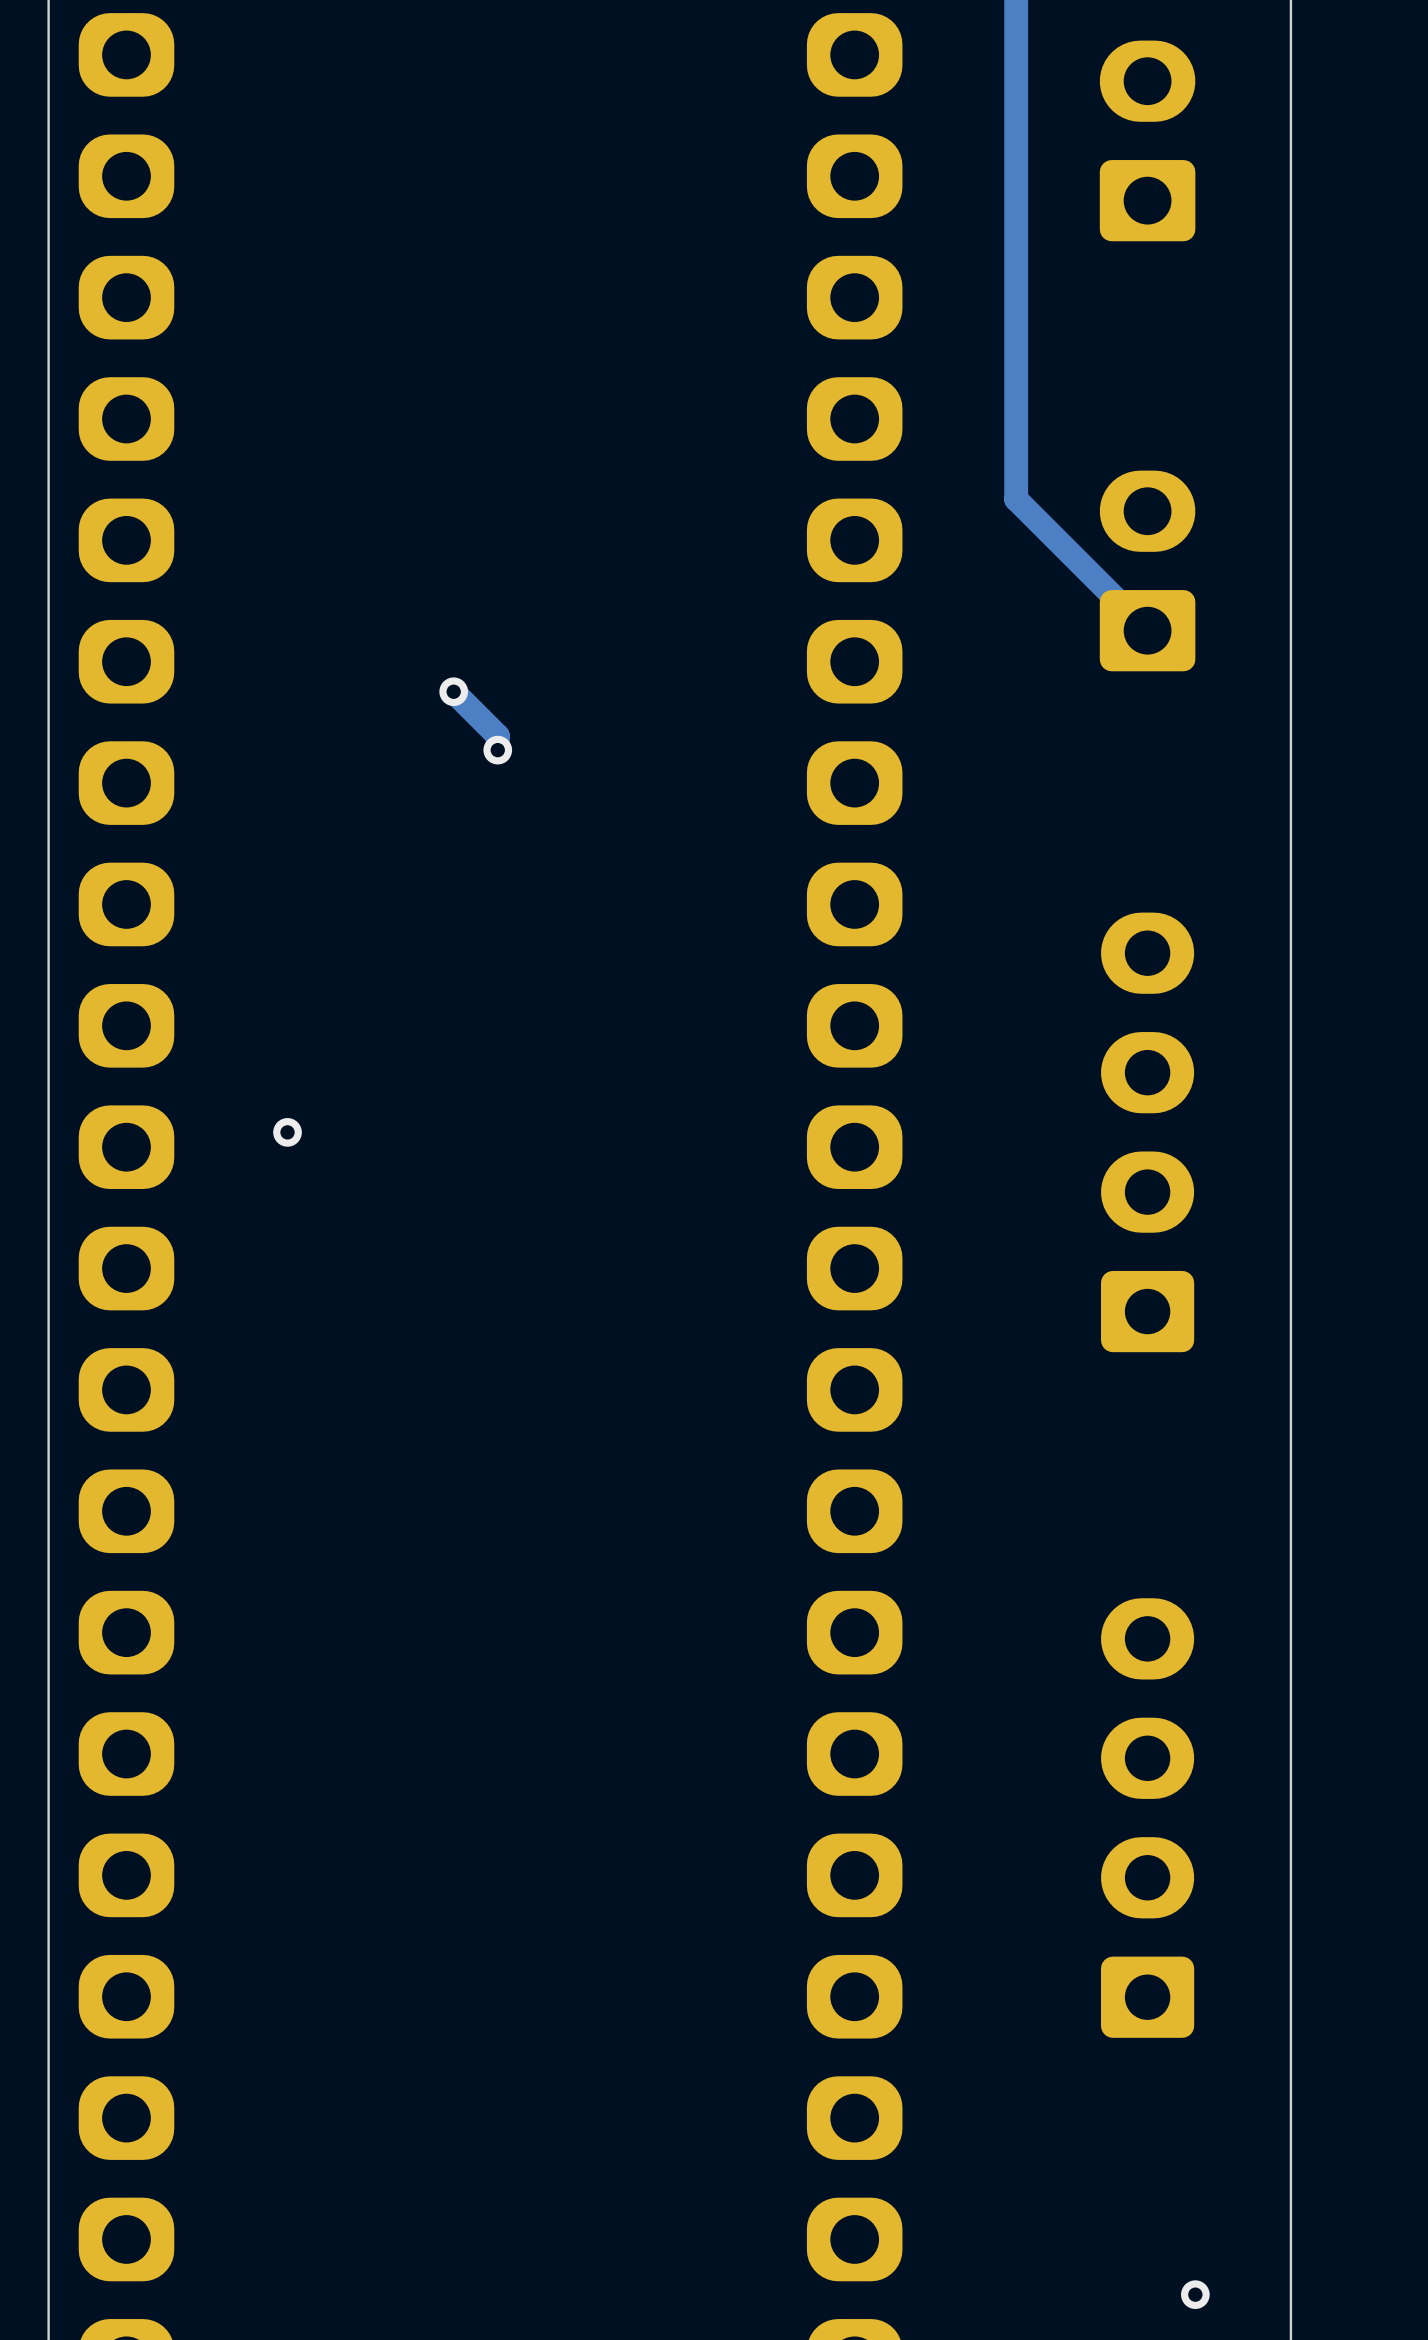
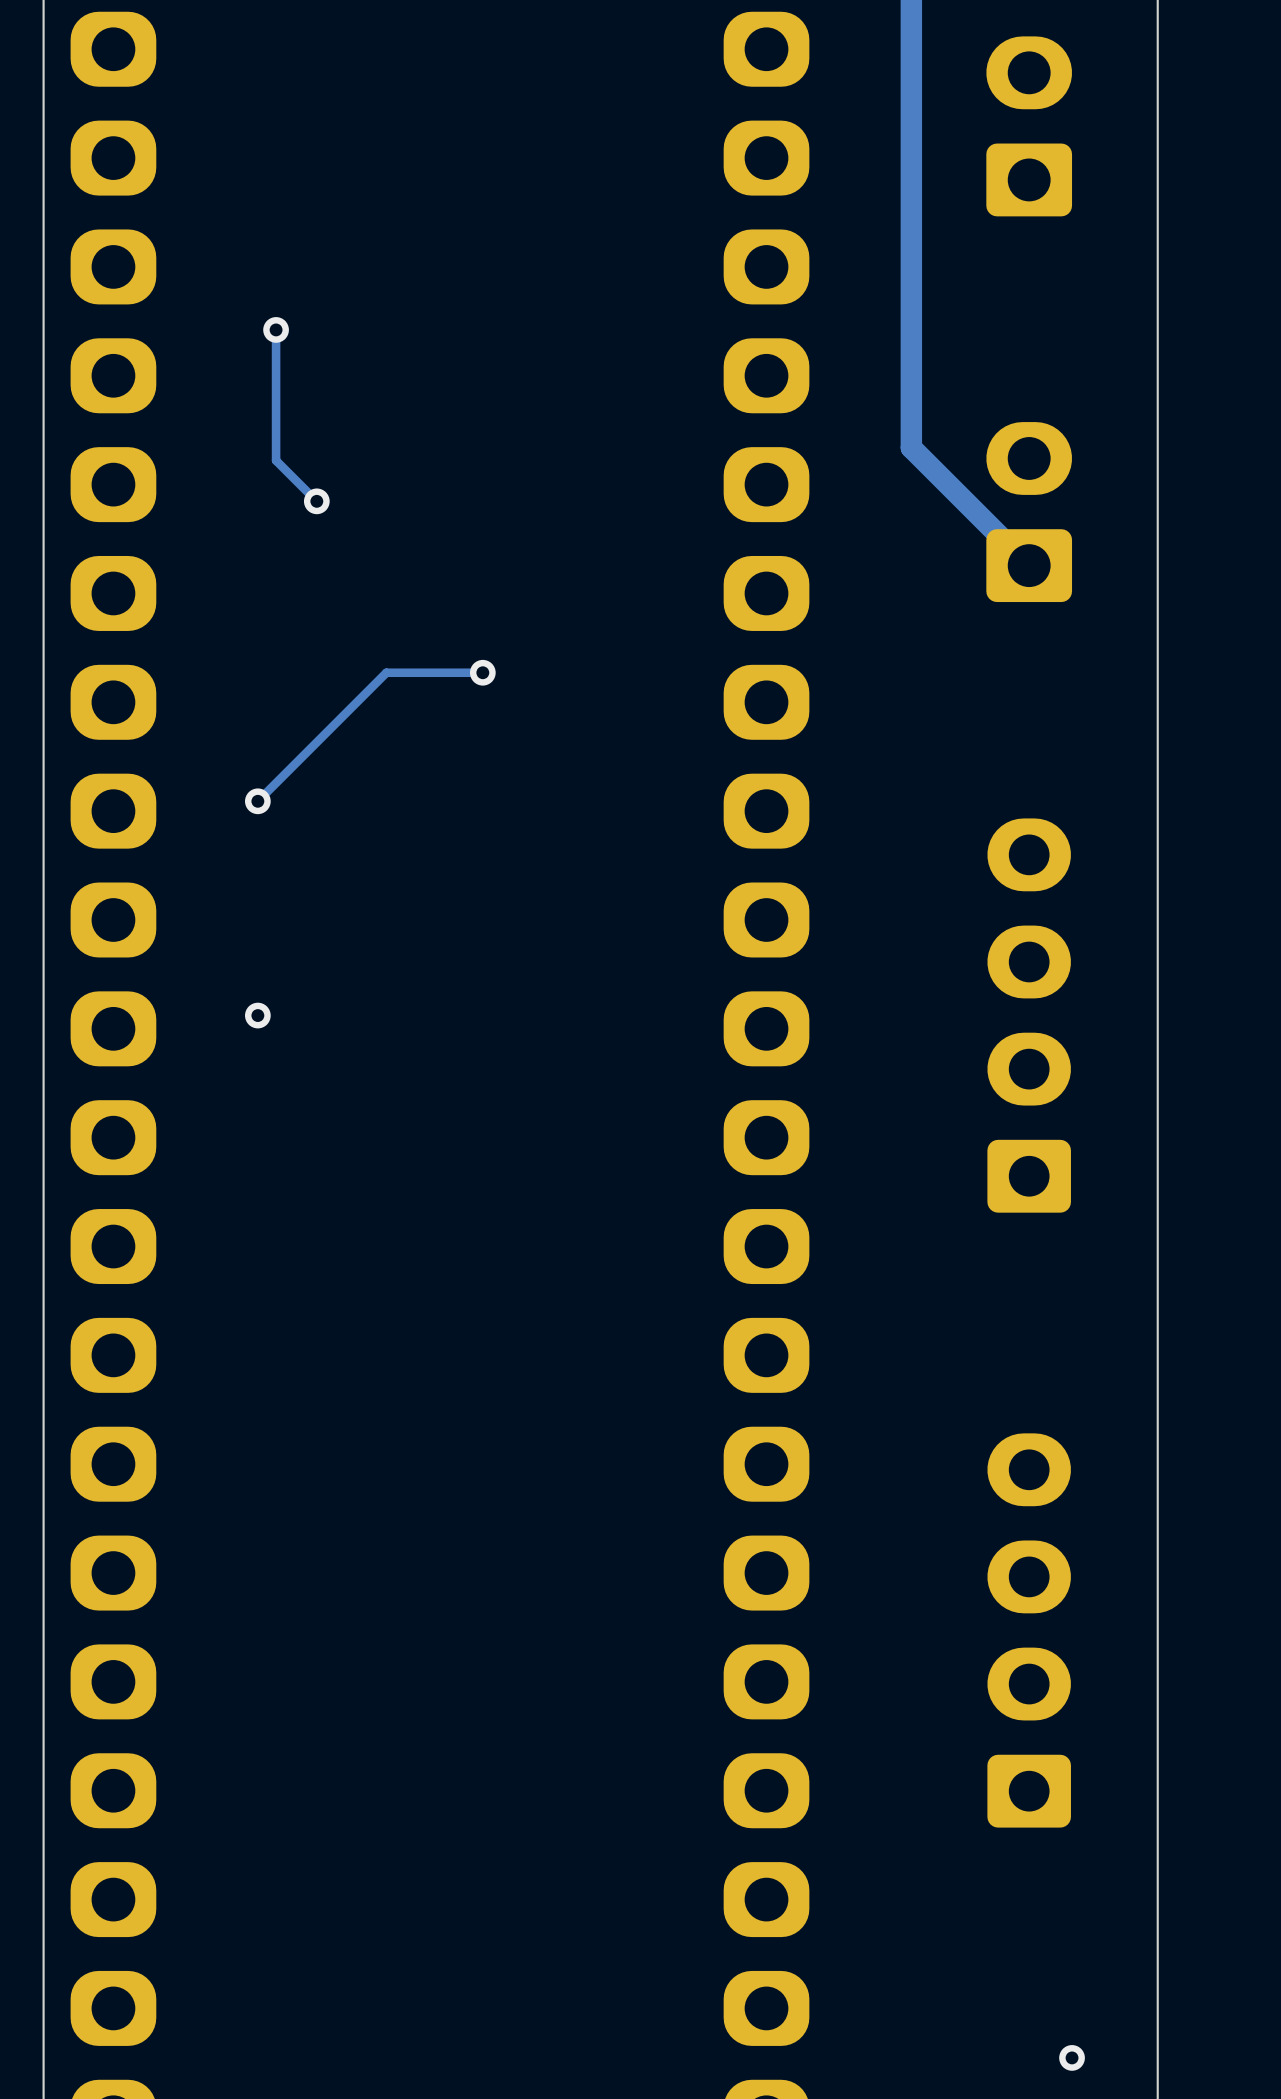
track: none -> (276, 329) (276, 460) (316, 501)
via: none -> (276, 329)
via: none -> (316, 501)
track: (453, 691) (497, 735) (497, 750) -> none
via: (453, 691) -> none
via position: (497, 750) -> (482, 672)
track: none -> (482, 672) (386, 672) (257, 801)
via: none -> (257, 801)

